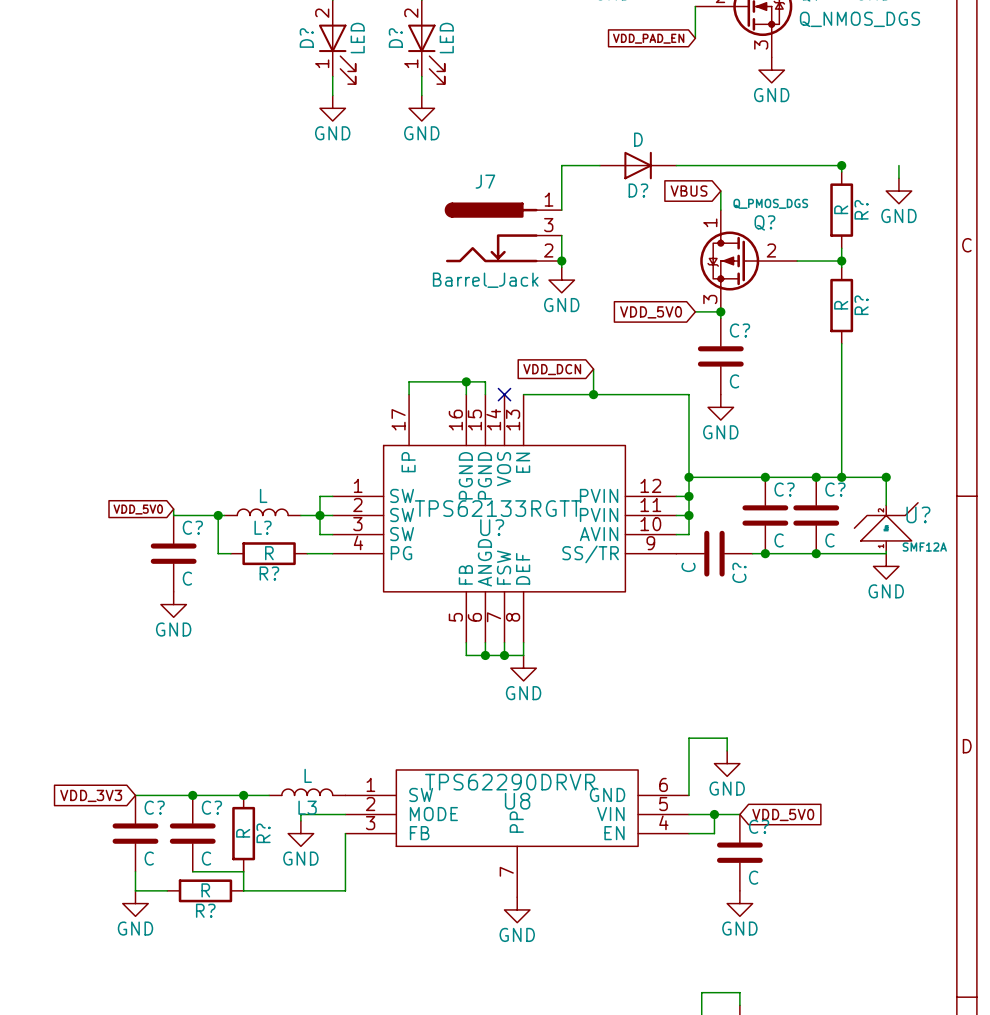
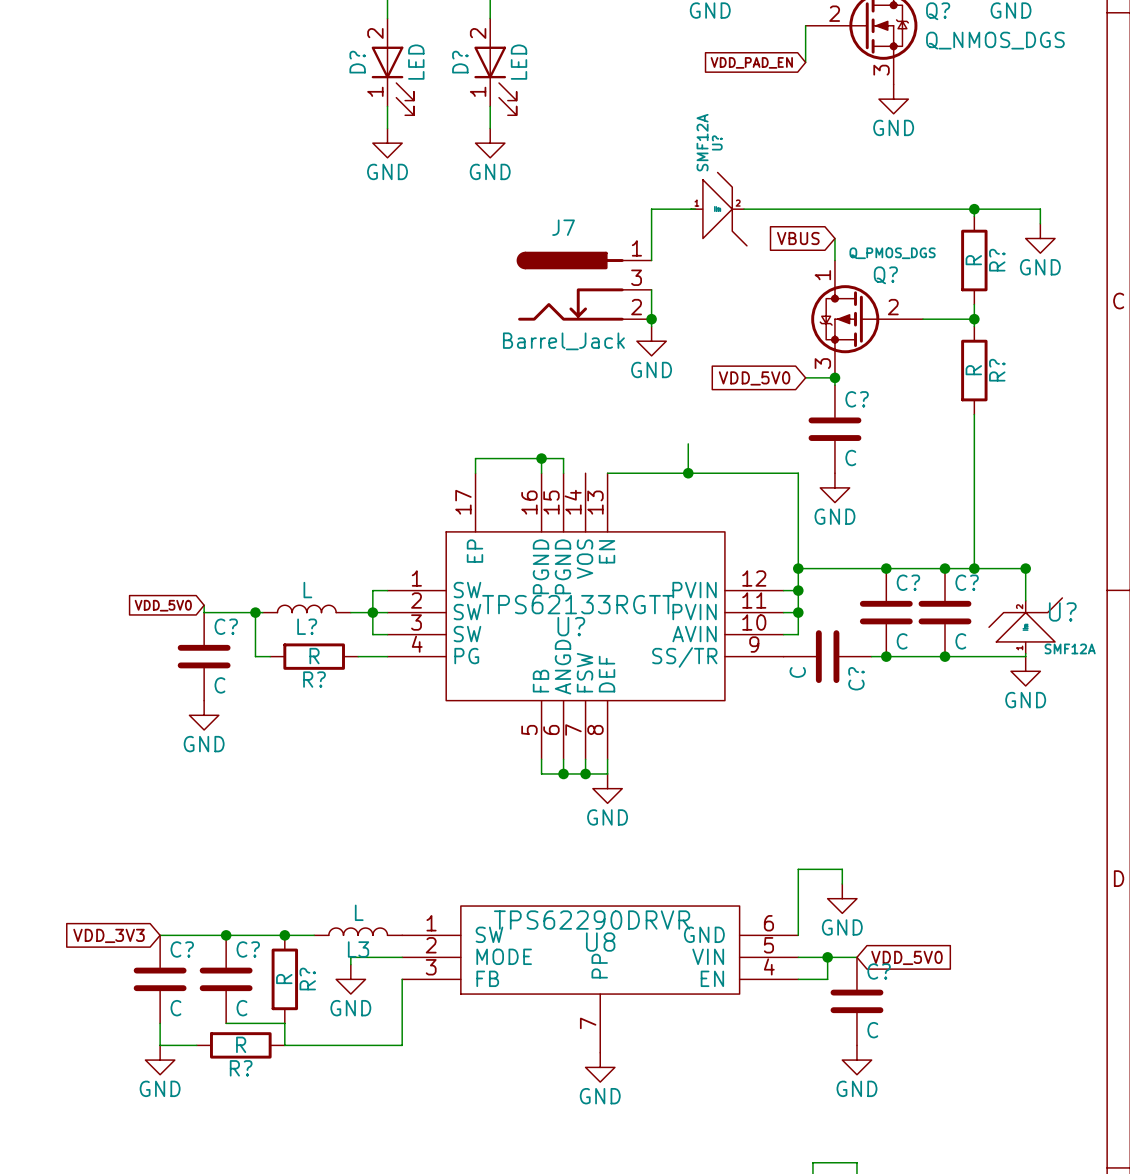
U?: none -> SMF12A (719, 209)
D?: D (638, 165) -> none
wire: none -> (974, 209) (1040, 209)
global label: VDD_DCN (552, 369) -> none
no-connect mark: (504, 394) -> none

